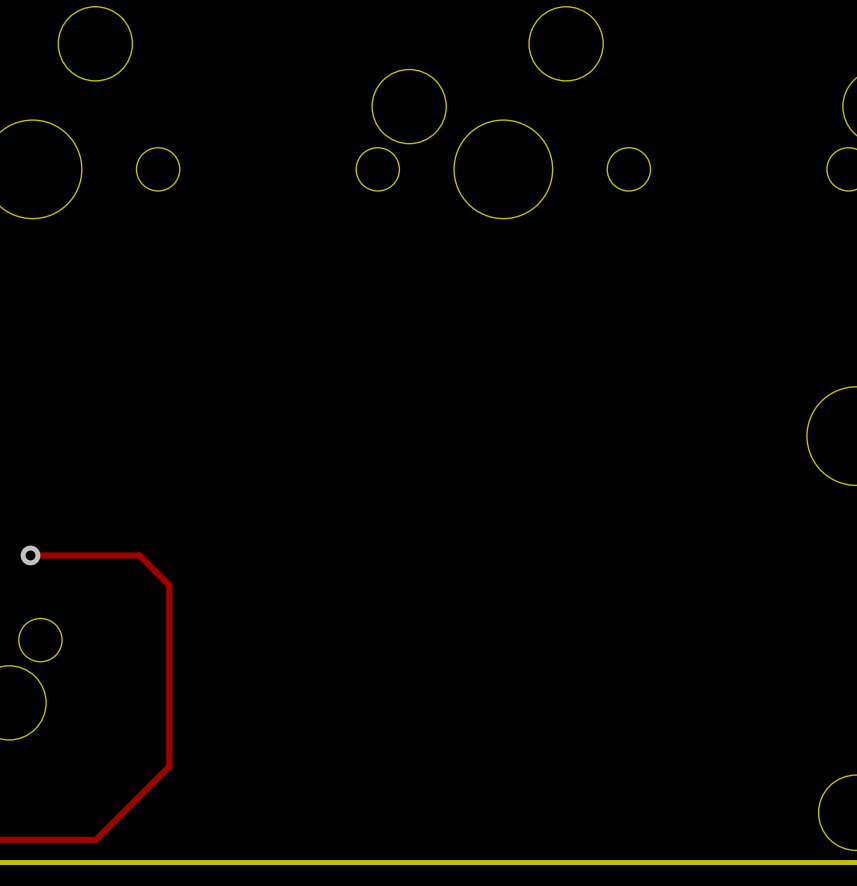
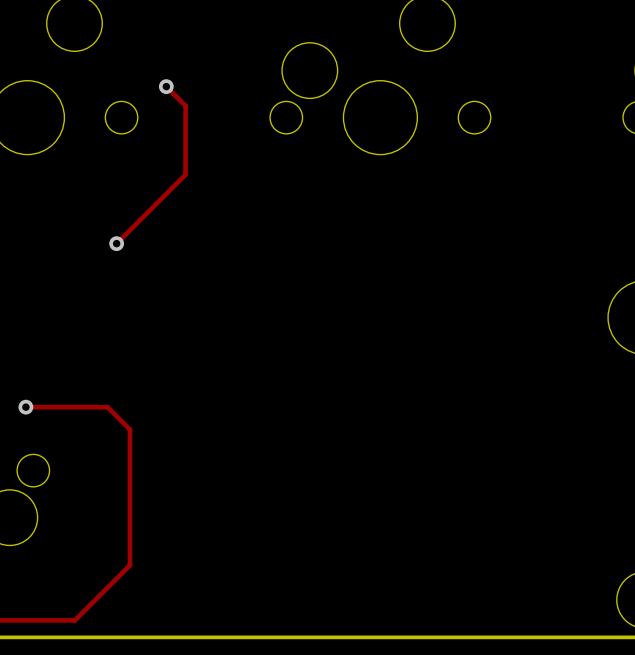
track: none -> (166, 86) (185, 105) (185, 174) (116, 243)
via: none -> (166, 86)
via: none -> (116, 243)

